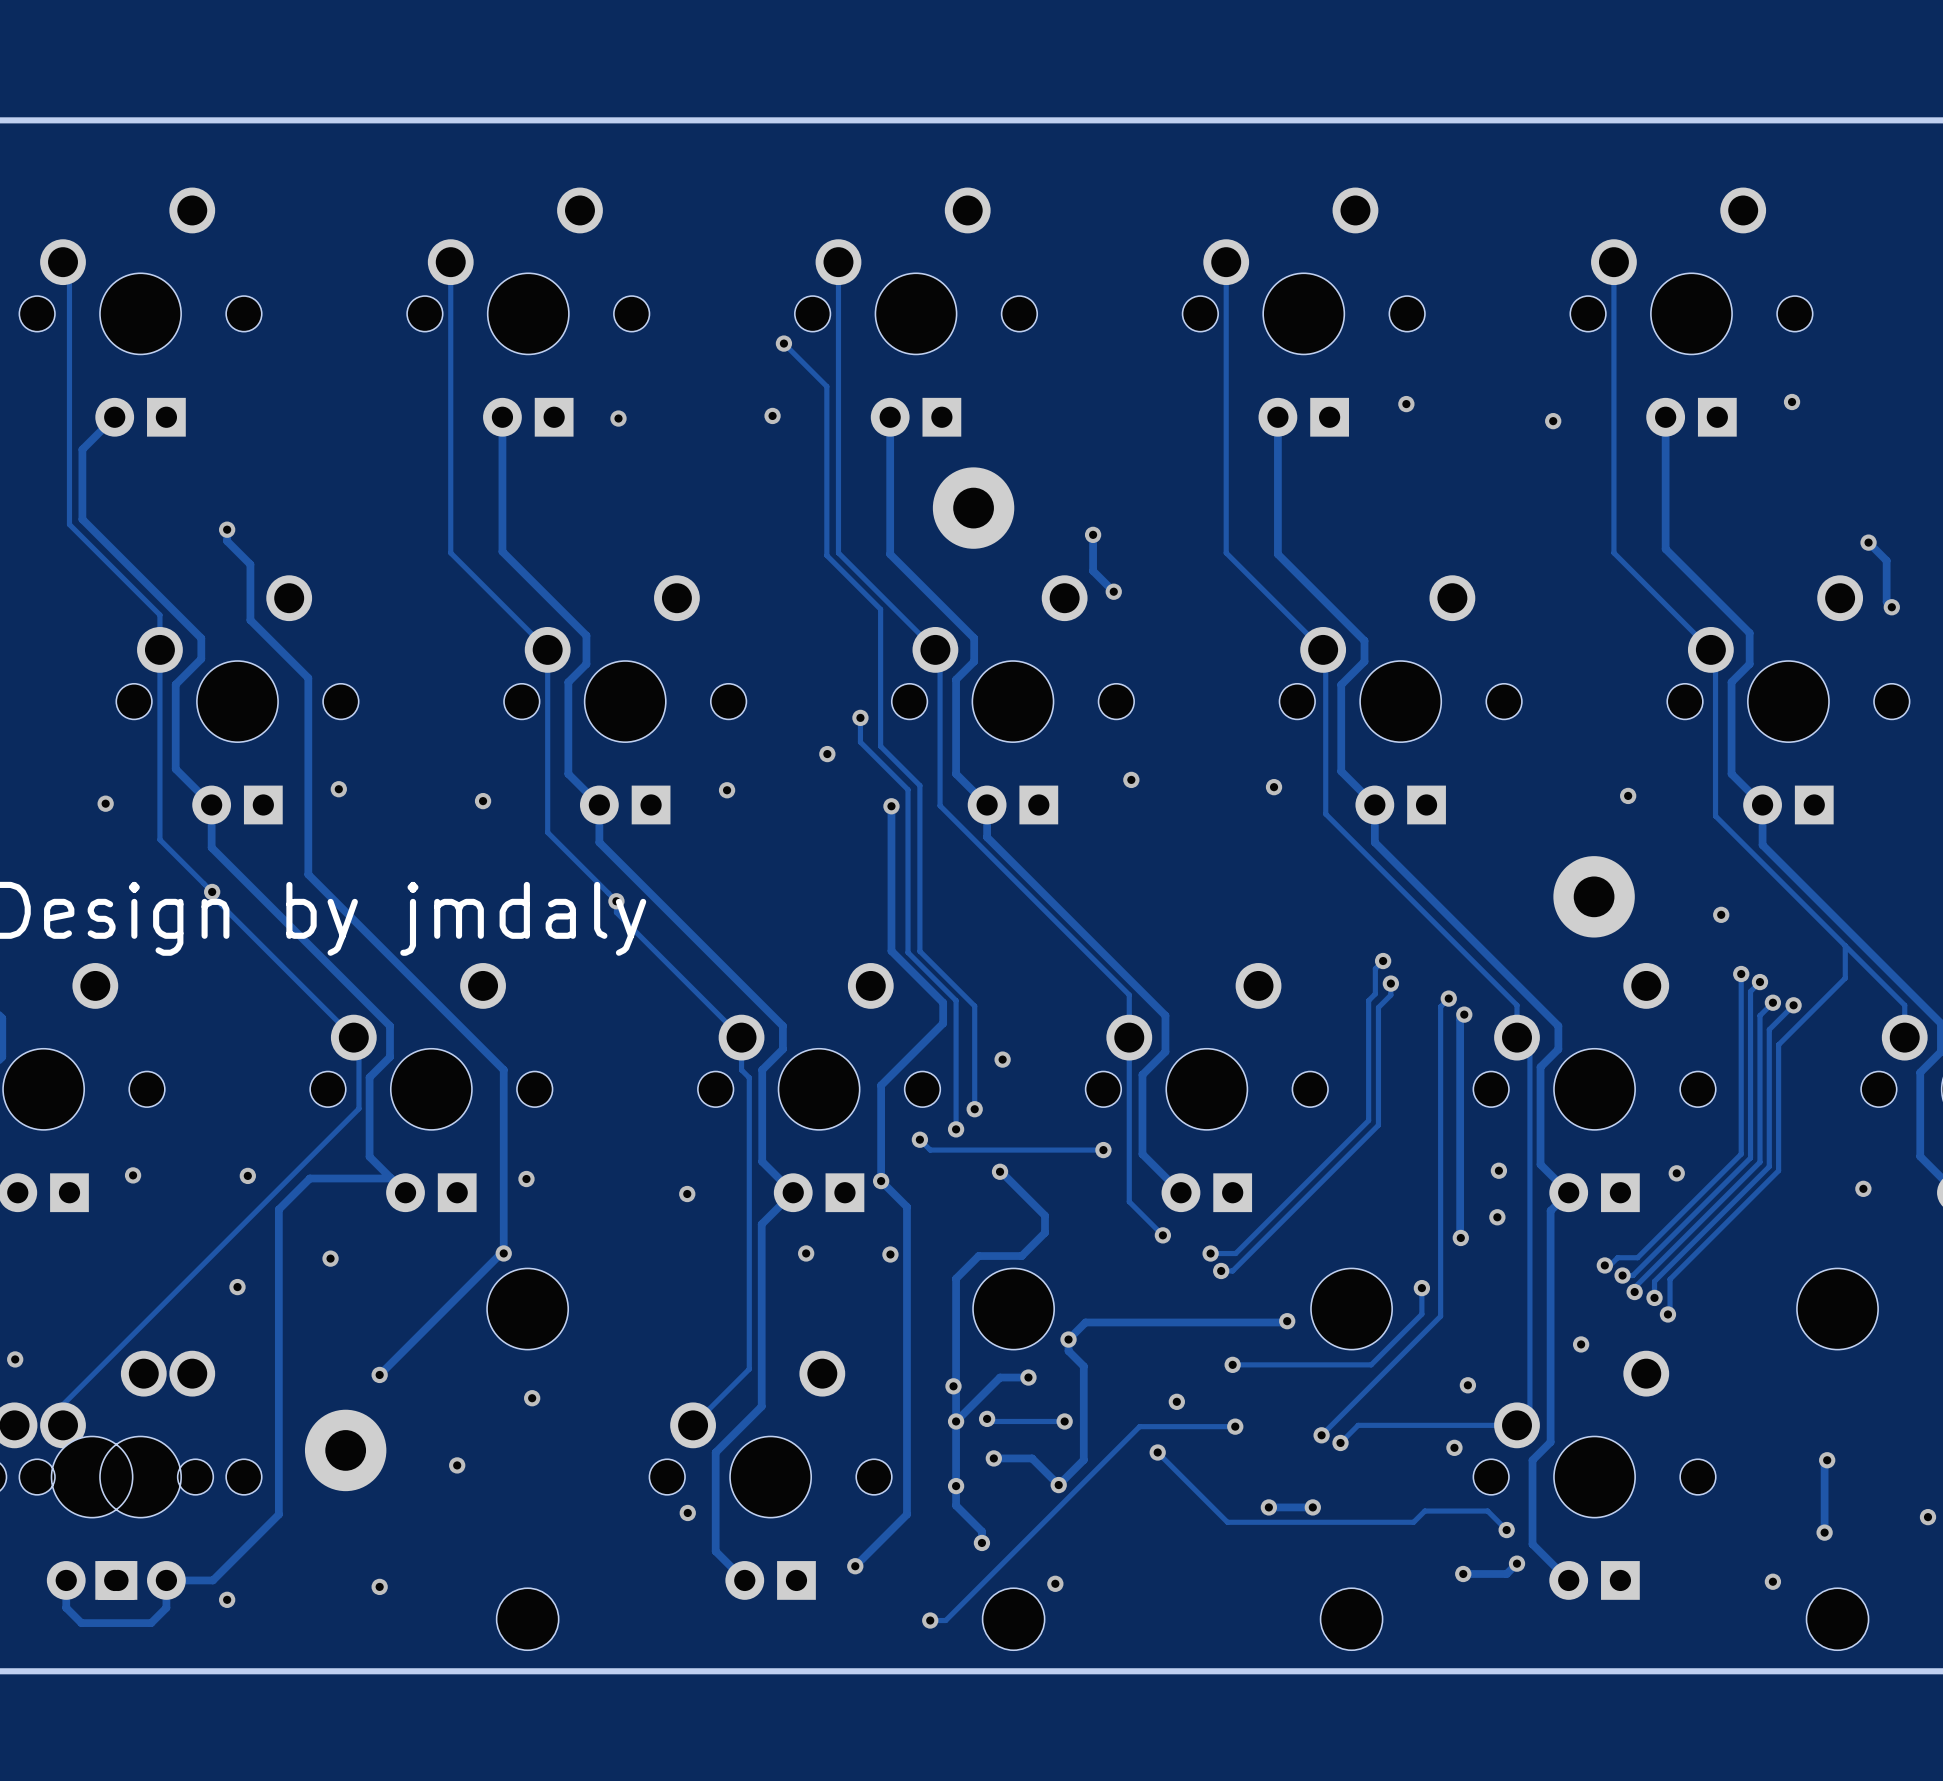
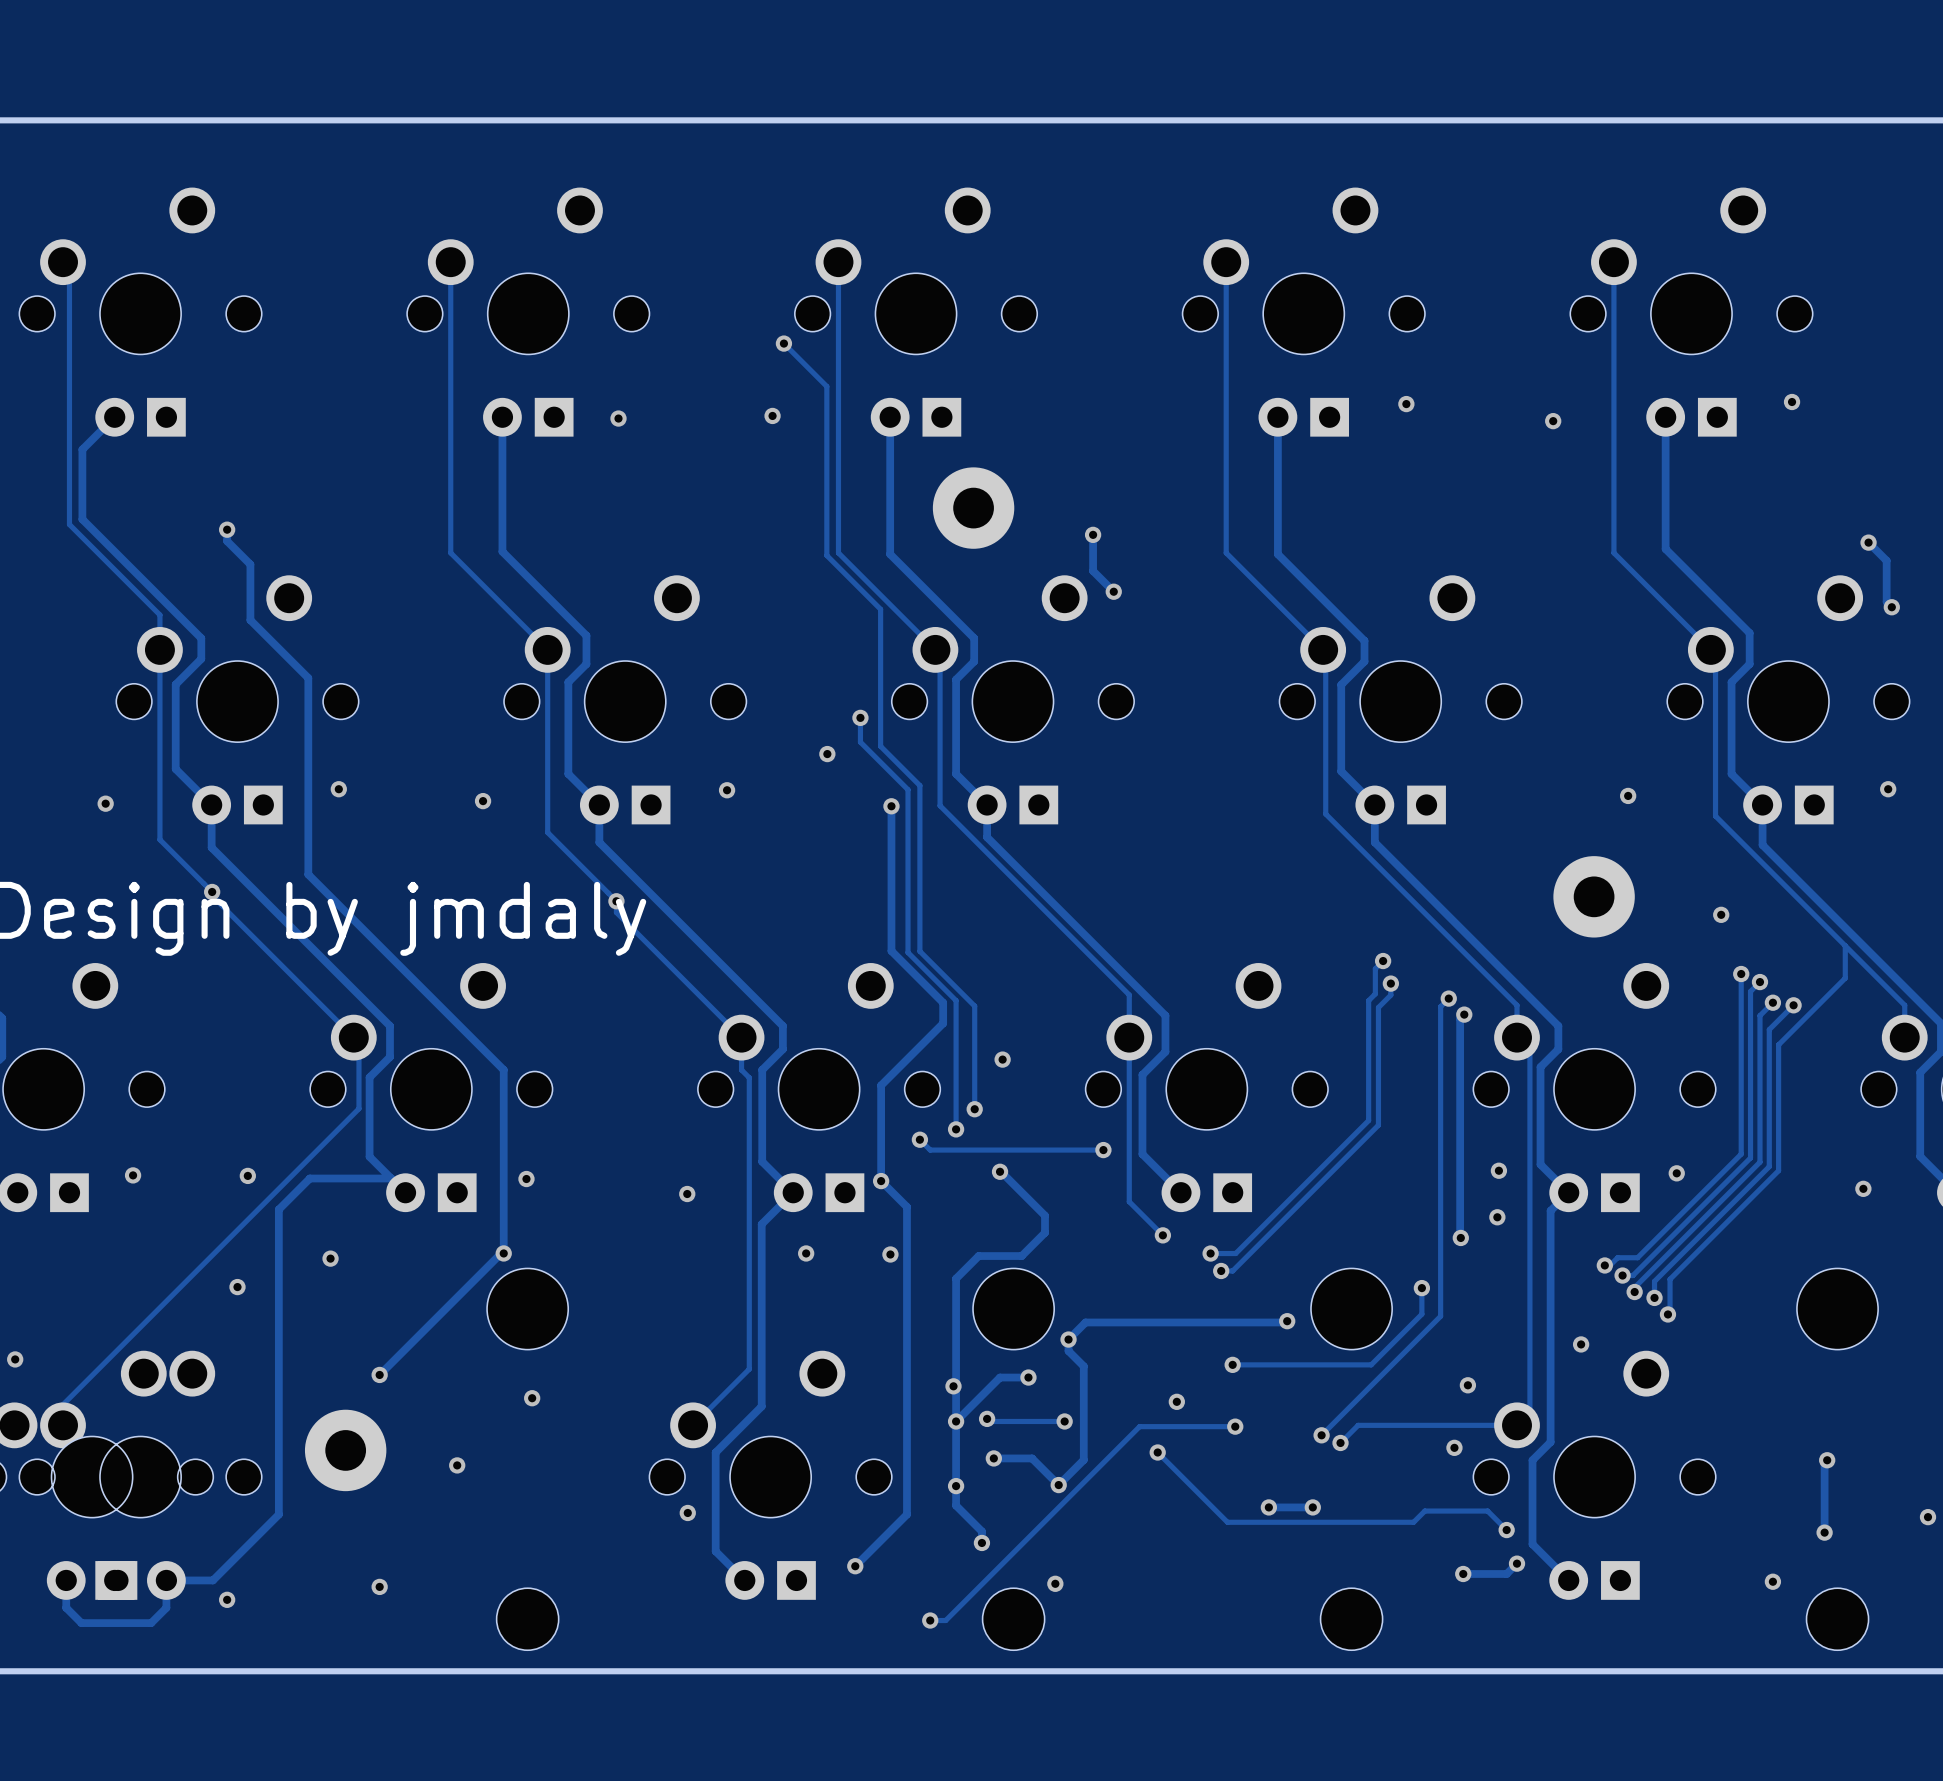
via: (1131, 779) -> none
via: (1274, 787) -> none
via: none -> (1888, 789)

